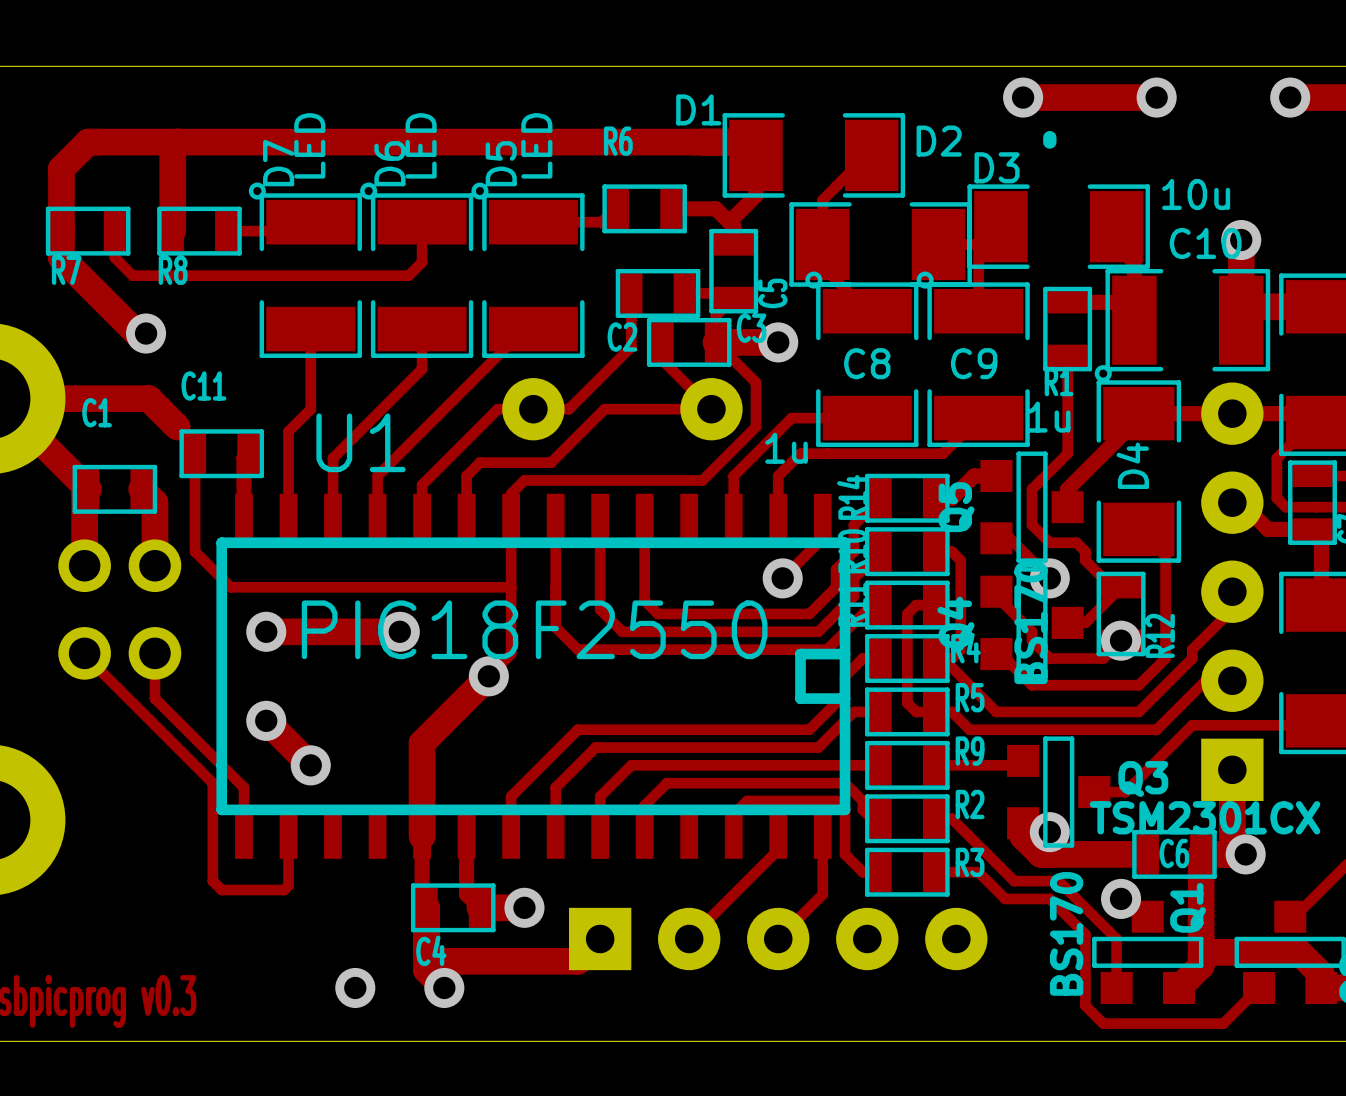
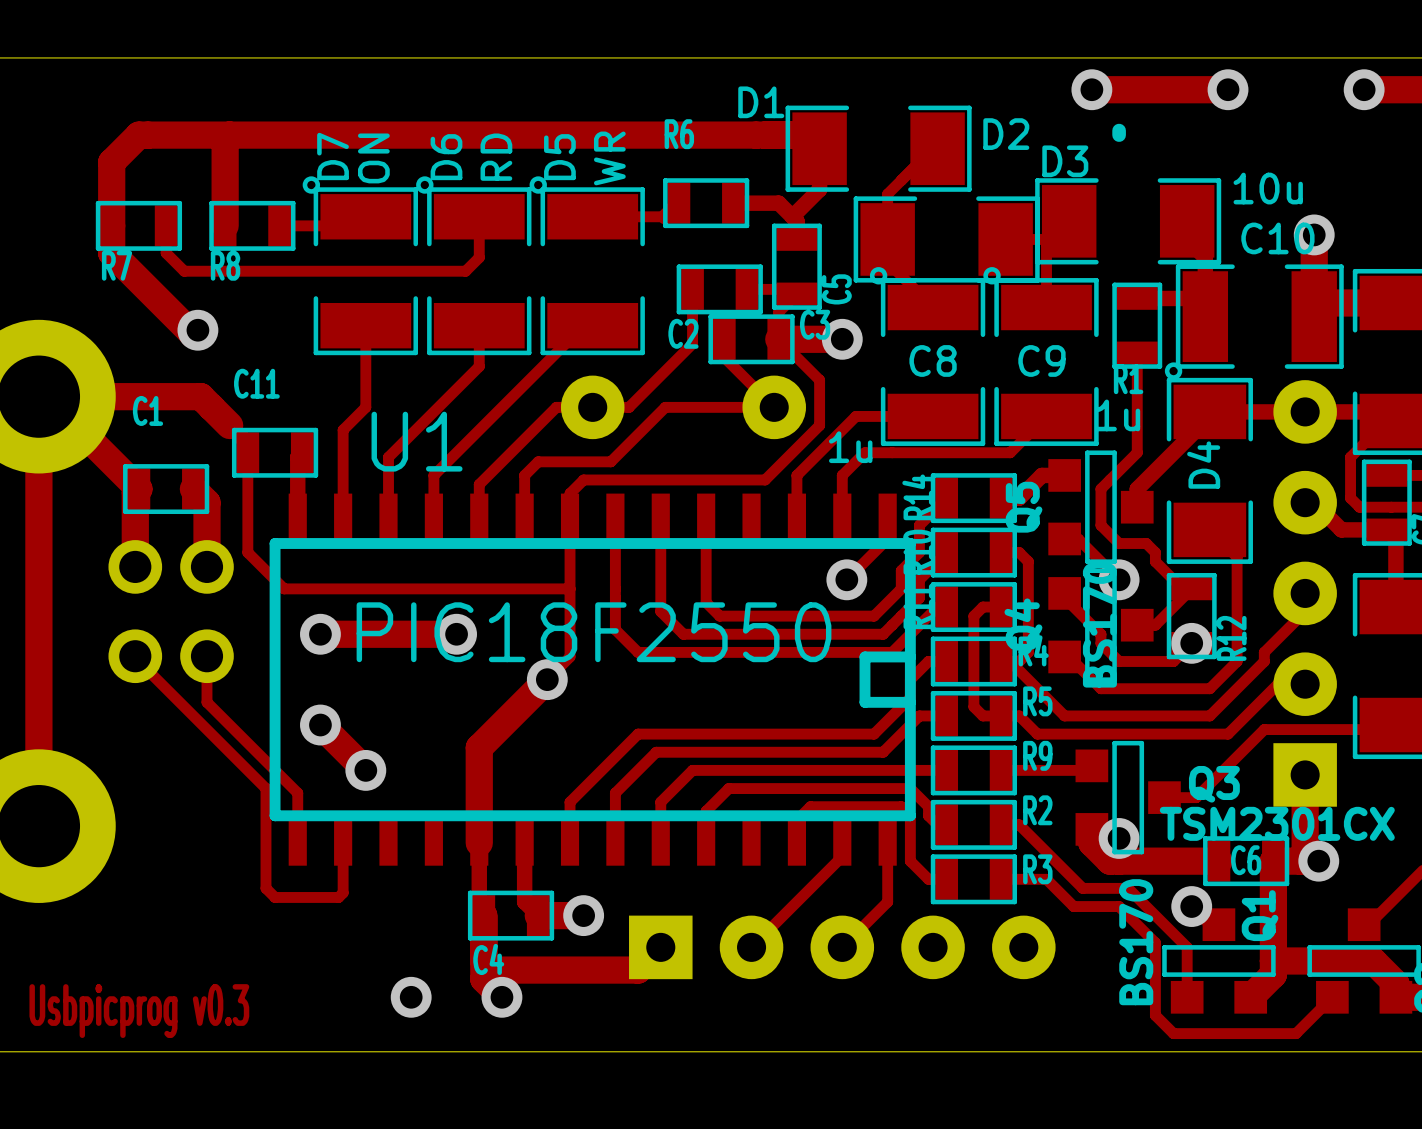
D7 value: LED (309, 145) -> ON (373, 158)
D6 value: LED (421, 145) -> RD (496, 157)
D5 value: LED (536, 145) -> WR (609, 158)

